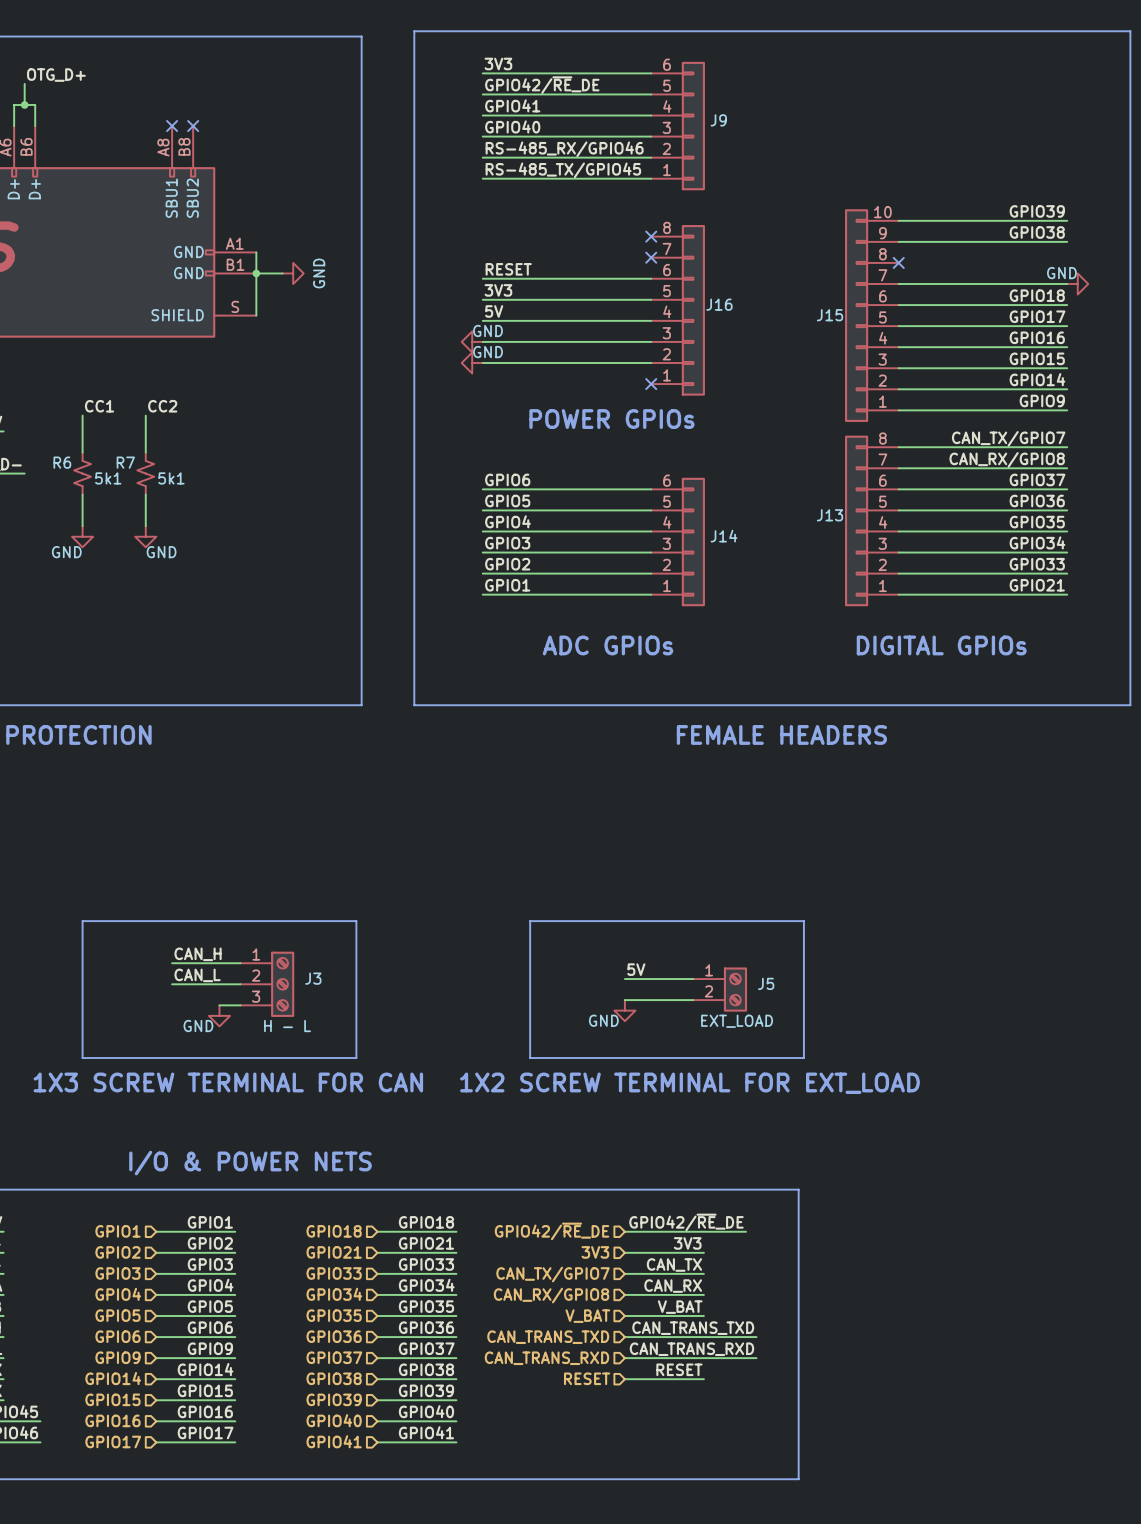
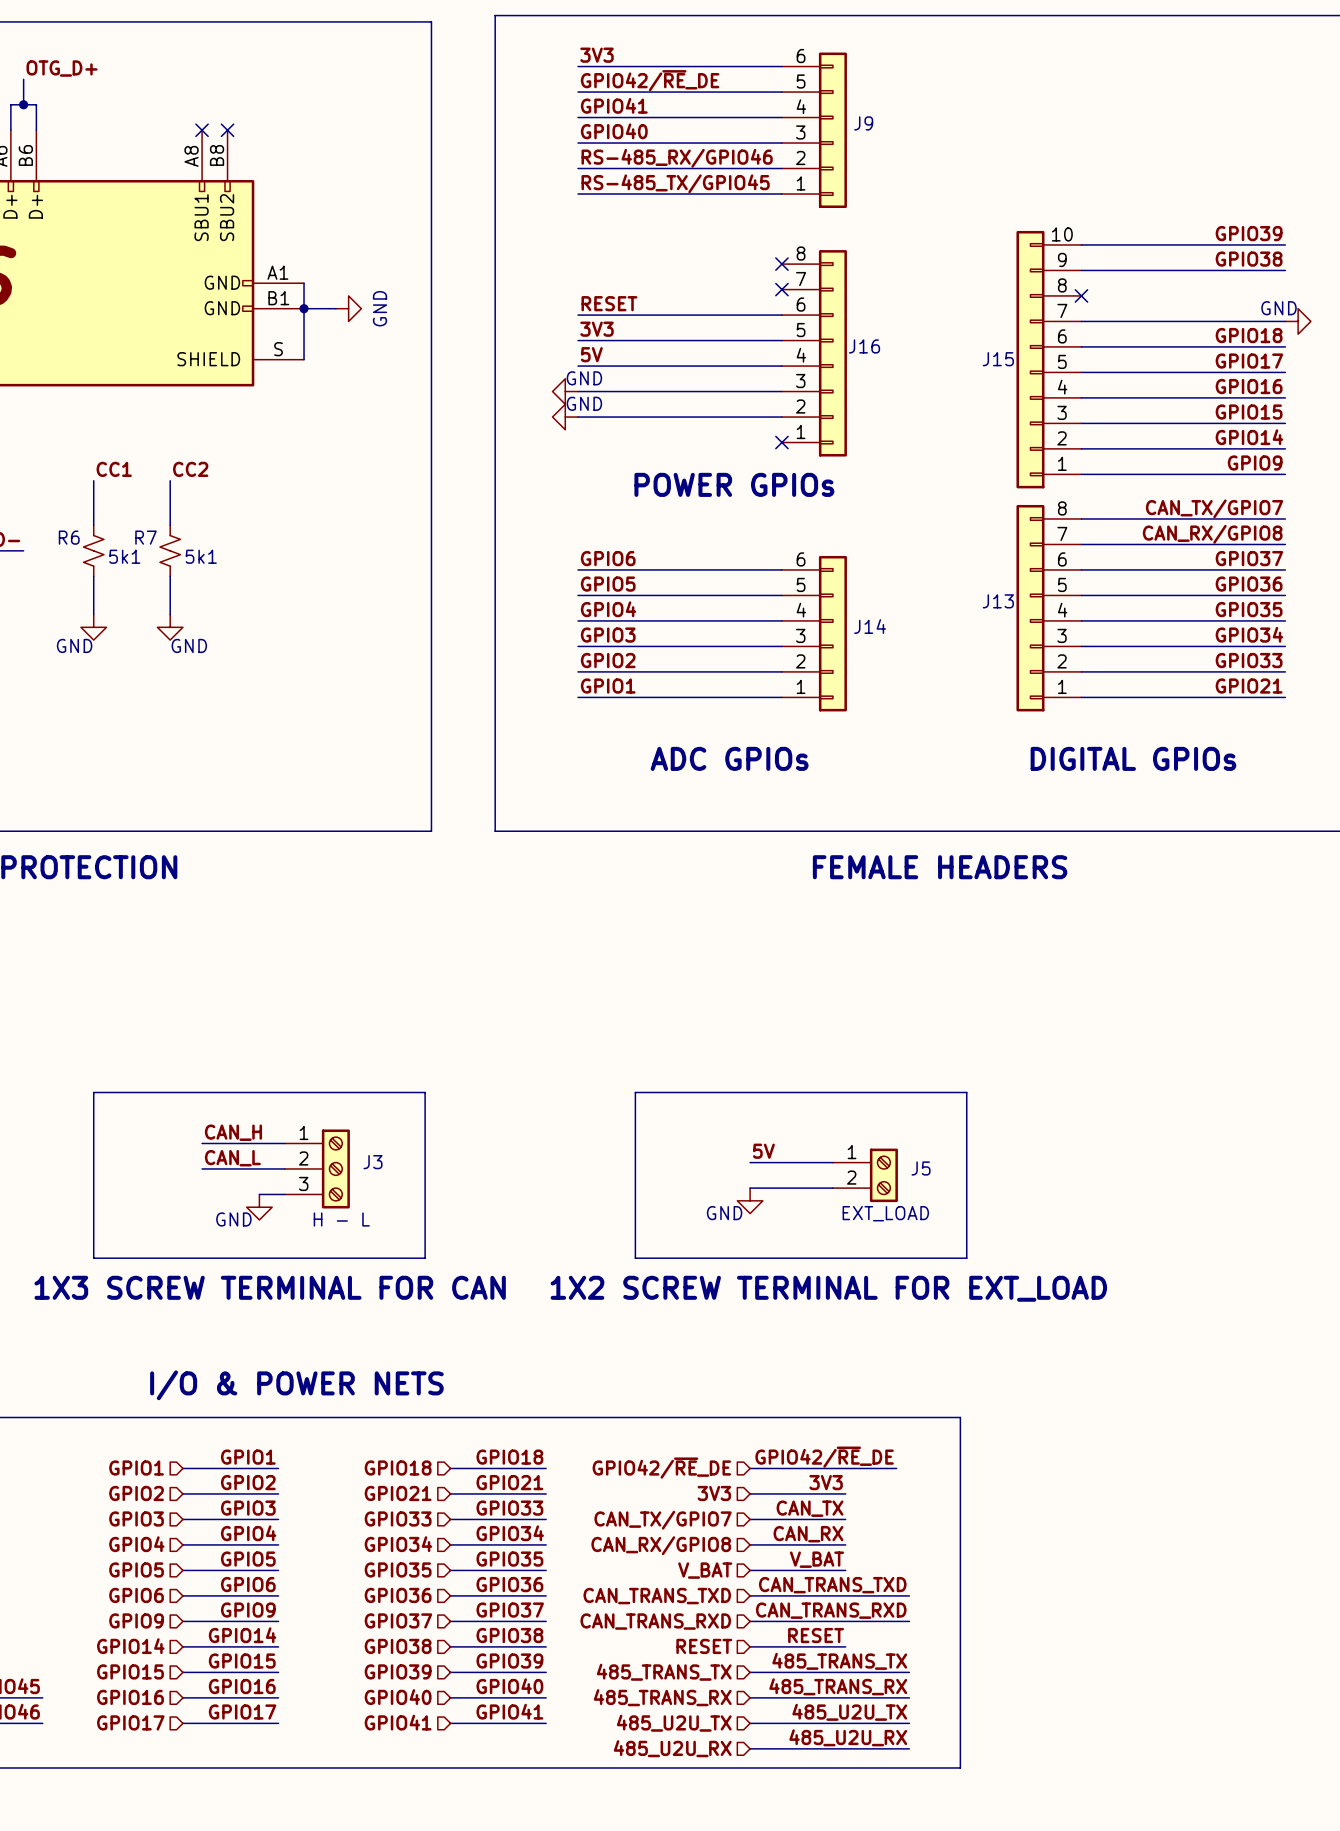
label: none -> 485_TRANS_TX (839, 1661)
hierarchical label: none -> 485_TRANS_TX (664, 1672)
wire: none -> (750, 1672) (909, 1672)
label: none -> 485_TRANS_RX (838, 1686)
hierarchical label: none -> 485_TRANS_RX (662, 1697)
wire: none -> (750, 1697) (909, 1697)
label: none -> 485_U2U_TX (849, 1712)
hierarchical label: none -> 485_U2U_TX (674, 1723)
wire: none -> (750, 1723) (909, 1723)
label: none -> 485_U2U_RX (848, 1737)
hierarchical label: none -> 485_U2U_RX (672, 1748)
wire: none -> (750, 1748) (909, 1748)

